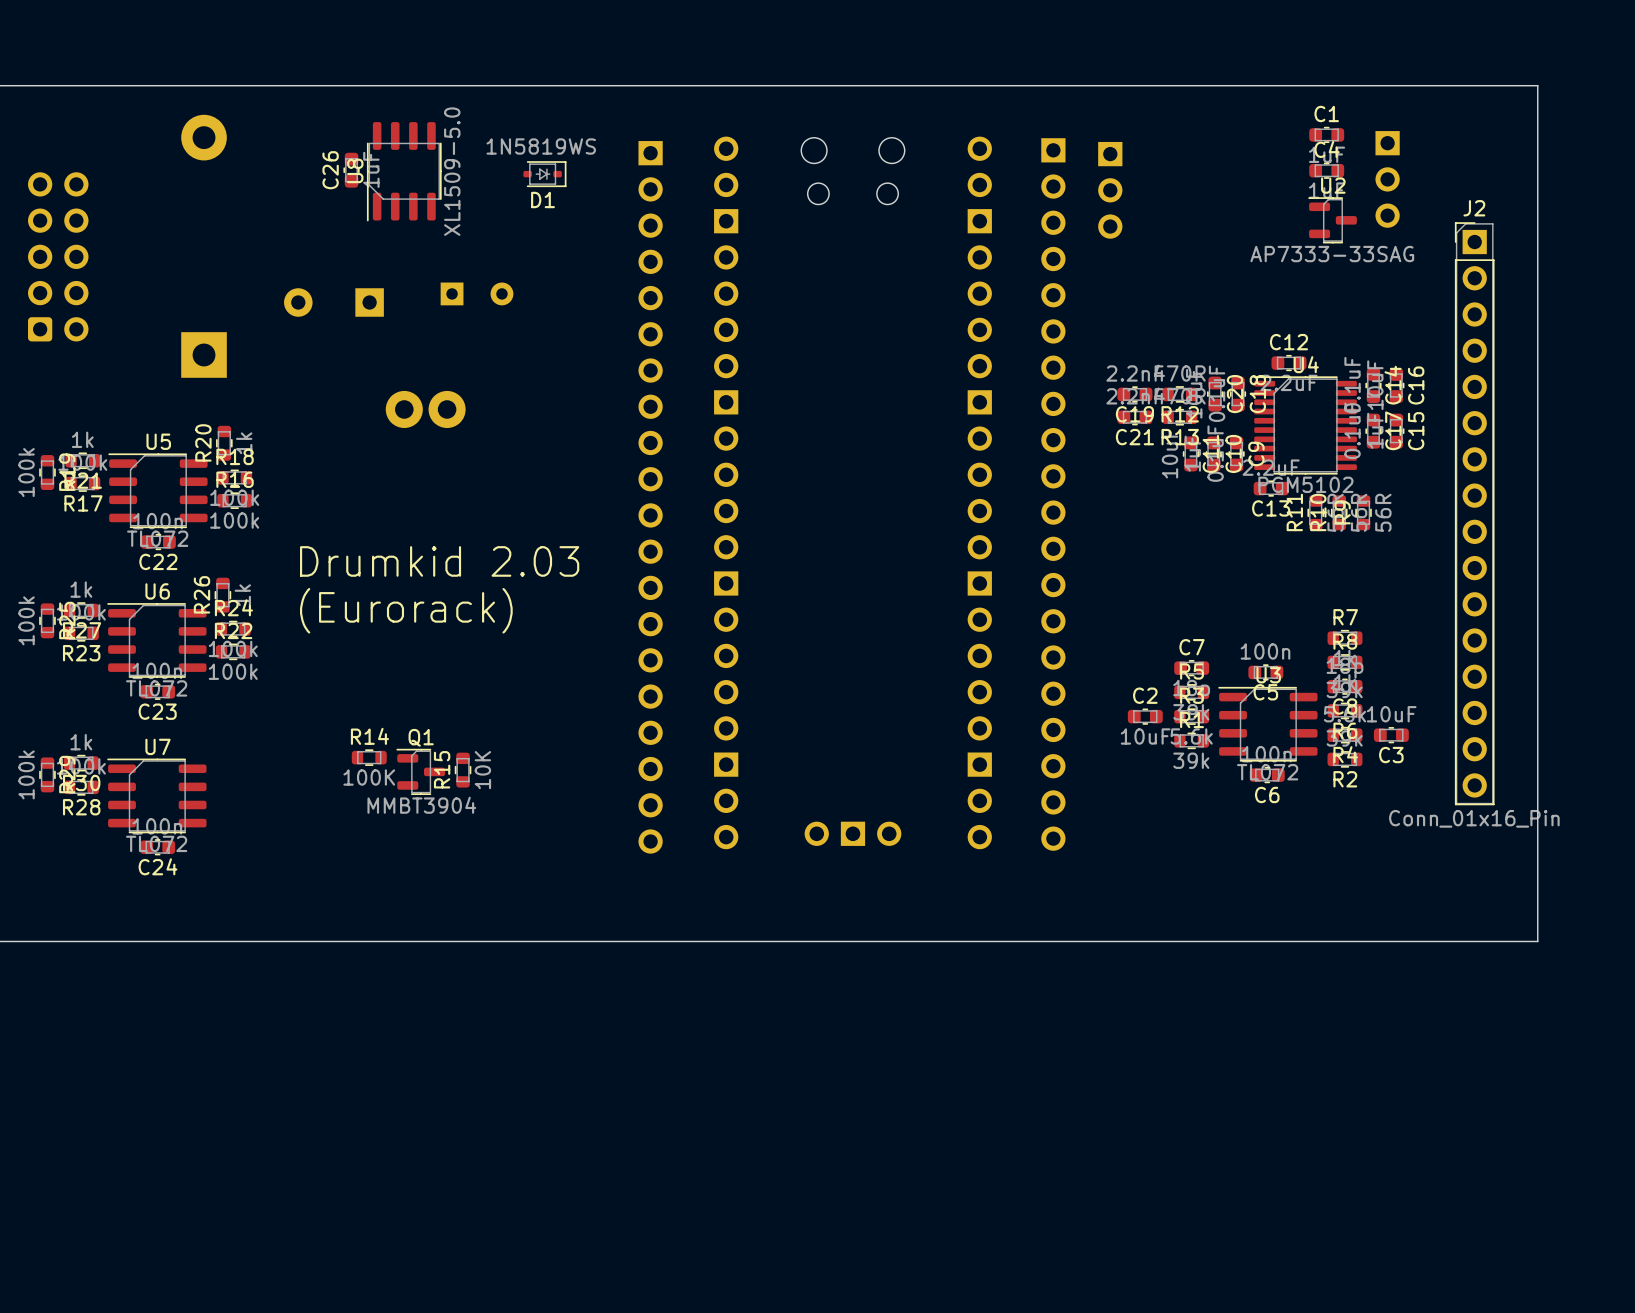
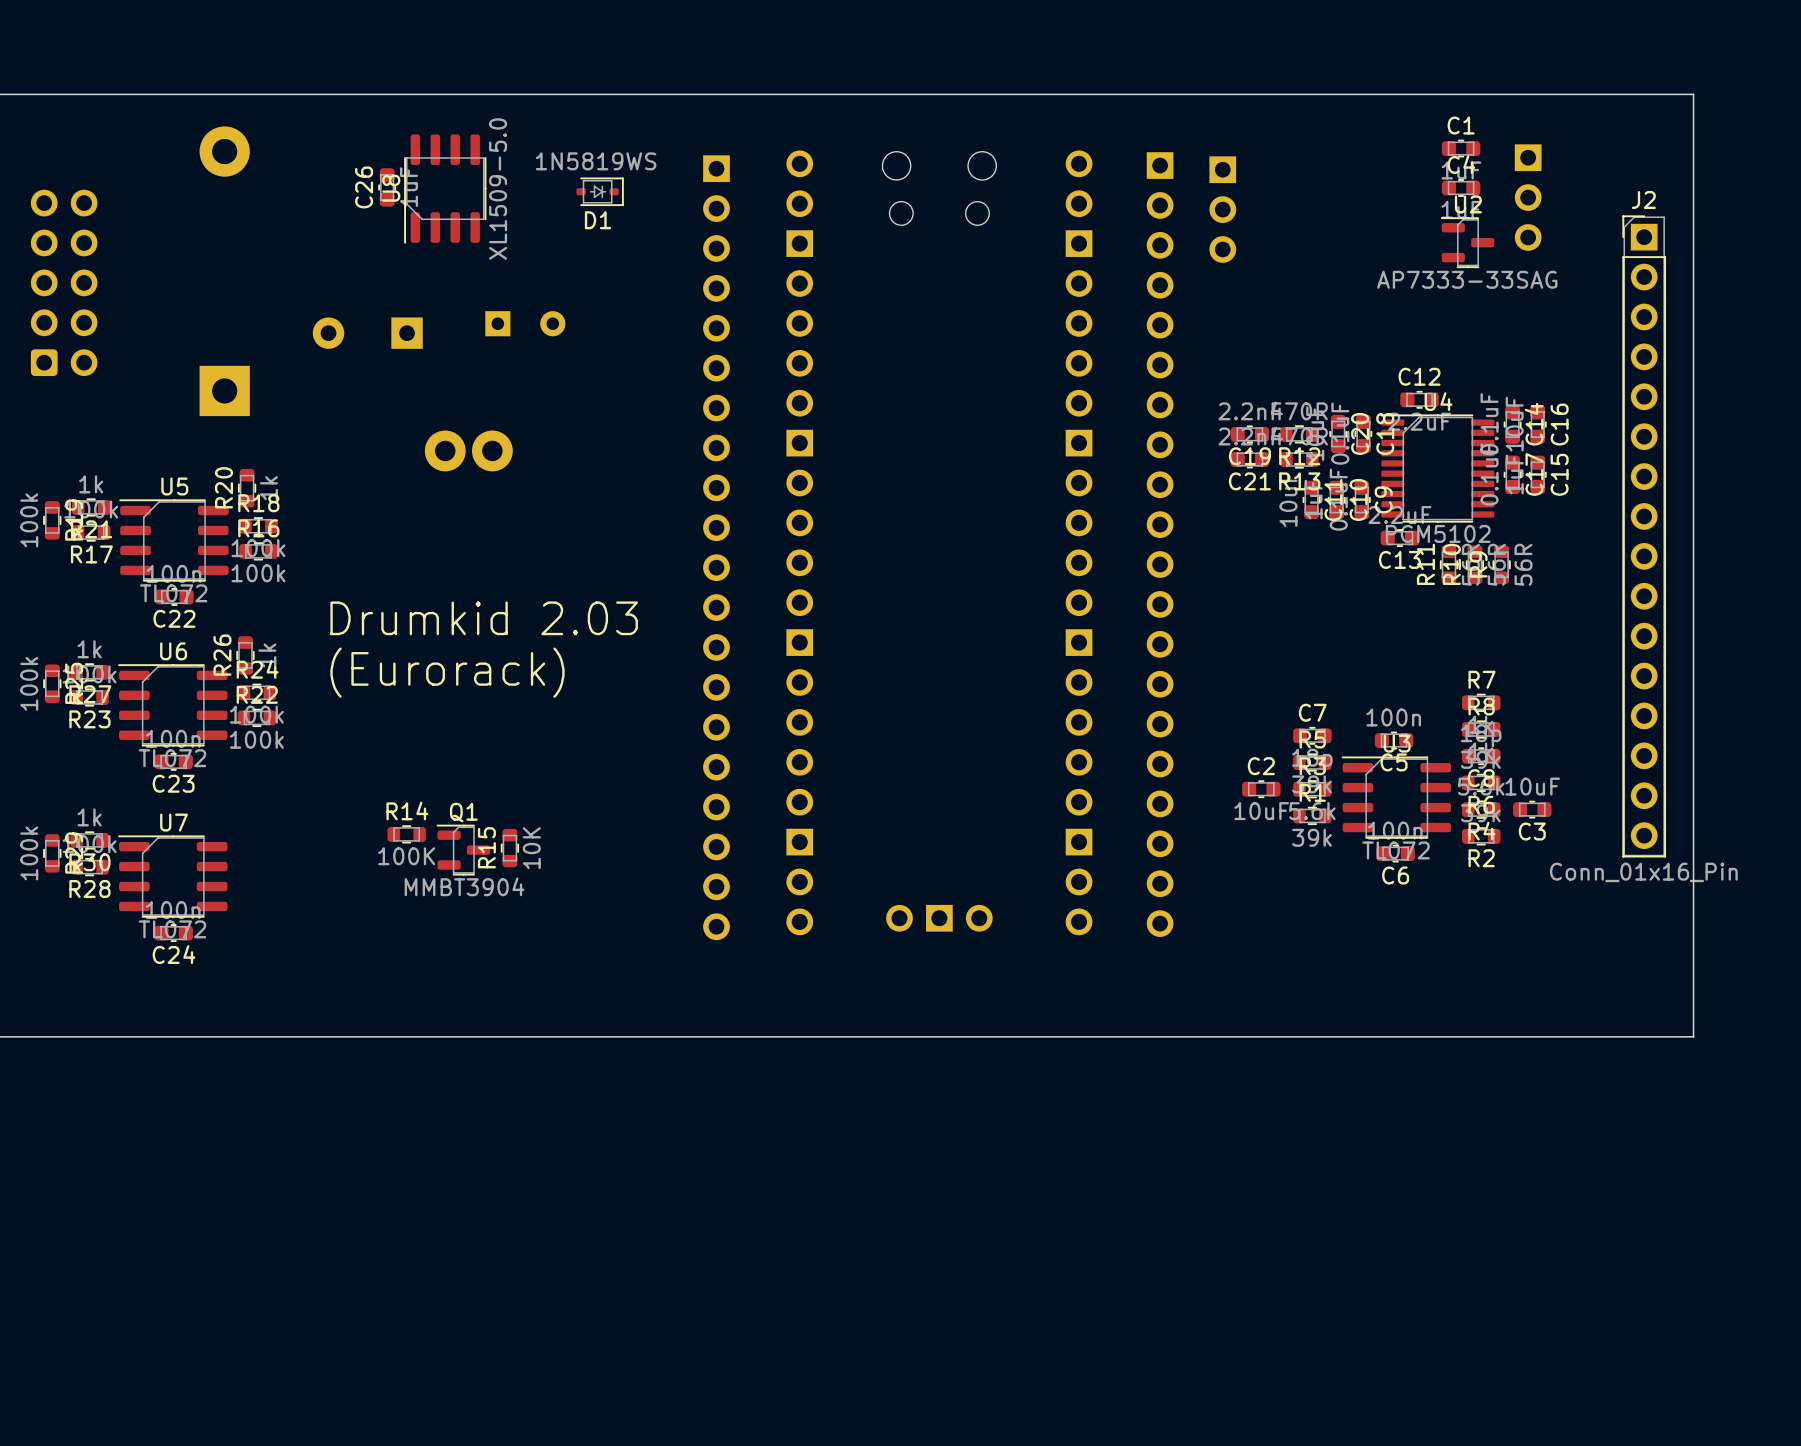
J2 position: (1474, 513) -> (1644, 536)

